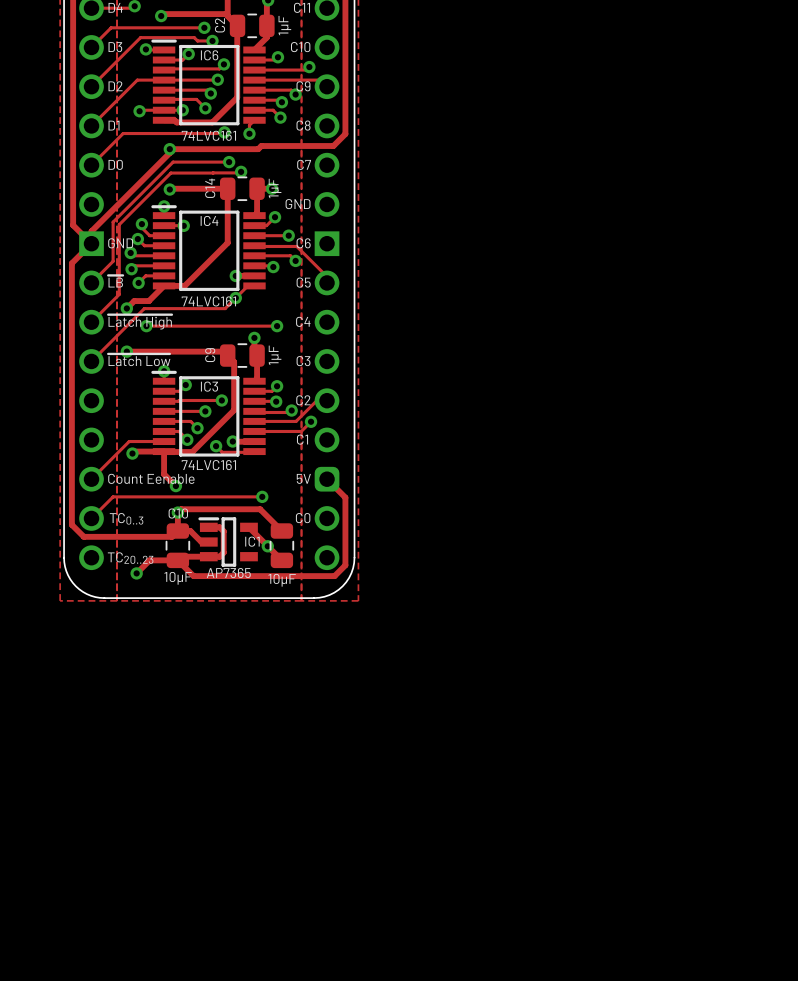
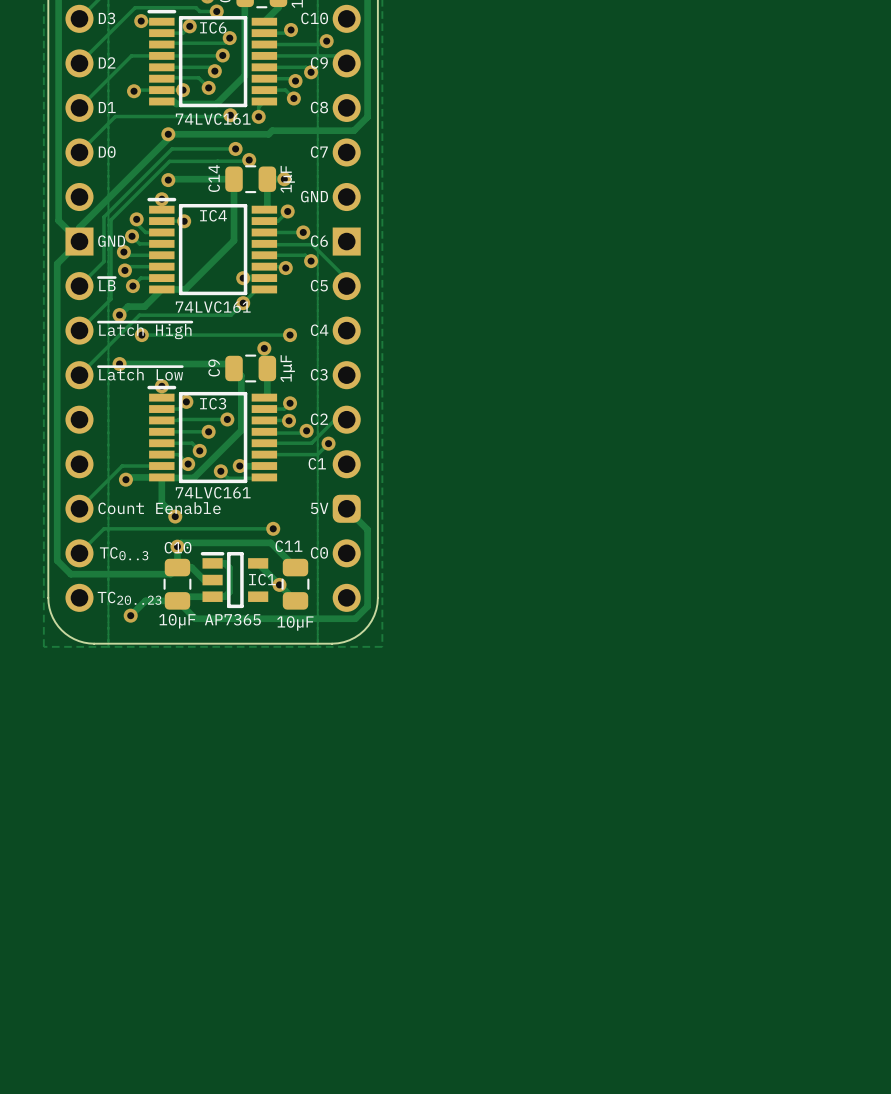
C11 name: none -> C11 (288, 546)
IC1 text: AP7365 (228, 573) -> none
IC1 text: none -> AP7365 (232, 619)

